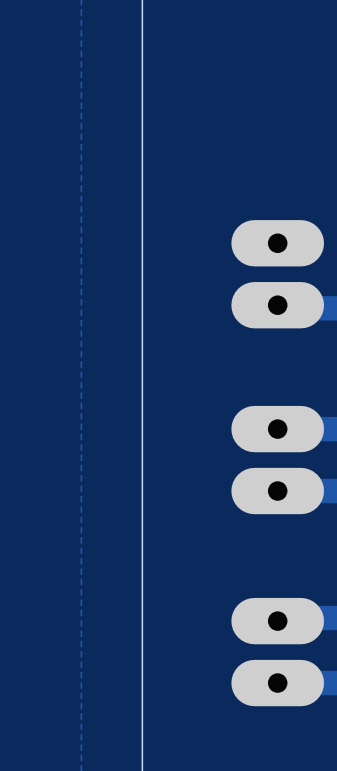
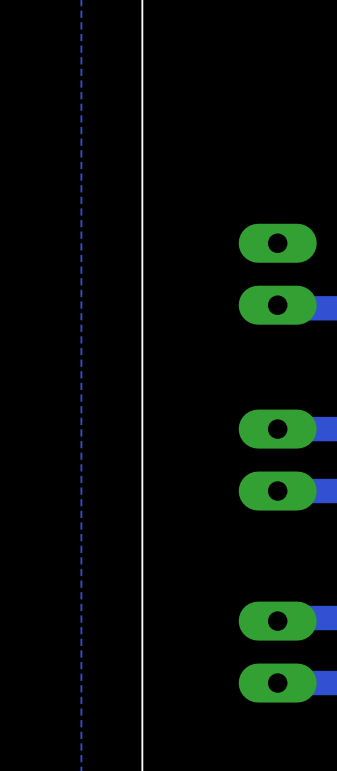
part footprint: [231, 220, 325, 329] -> [238, 223, 317, 325]
part footprint: [231, 405, 325, 515] -> [238, 409, 317, 511]
part footprint: [231, 597, 325, 707] -> [238, 601, 317, 703]

